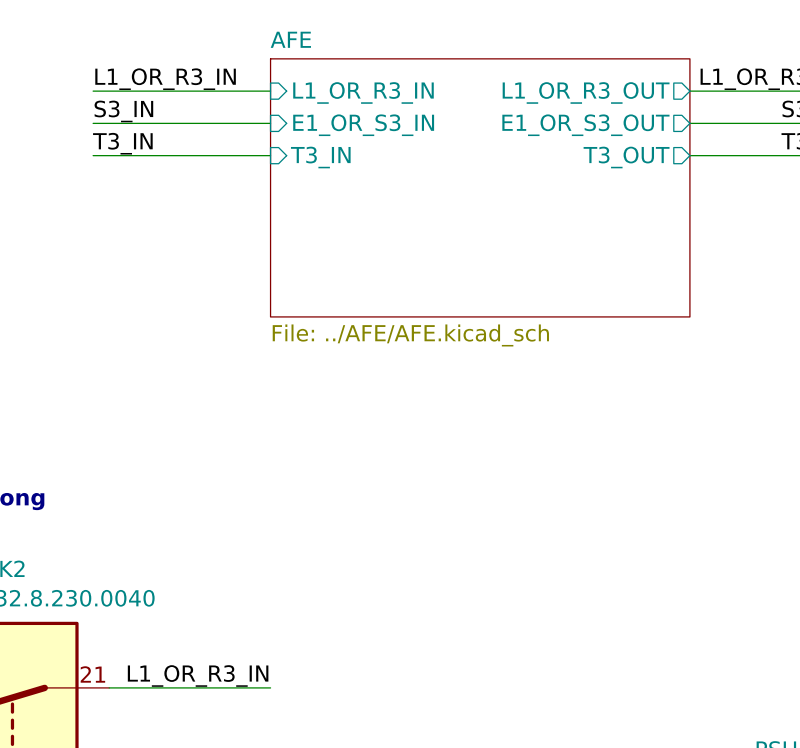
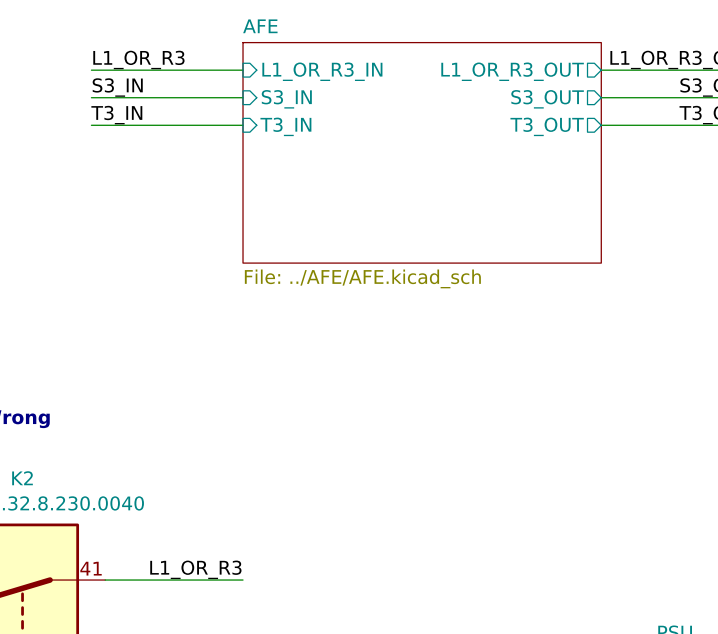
label: L1_OR_R3_IN (165, 79) -> L1_OR_R3 (138, 59)
sheet pin: E1_OR_S3_IN (363, 125) -> S3_IN (286, 99)
sheet pin: E1_OR_S3_OUT (585, 125) -> S3_OUT (547, 99)
K2 pin number: 21 (92, 674) -> 41 (91, 568)
label: L1_OR_R3_IN (198, 676) -> L1_OR_R3 (195, 569)

